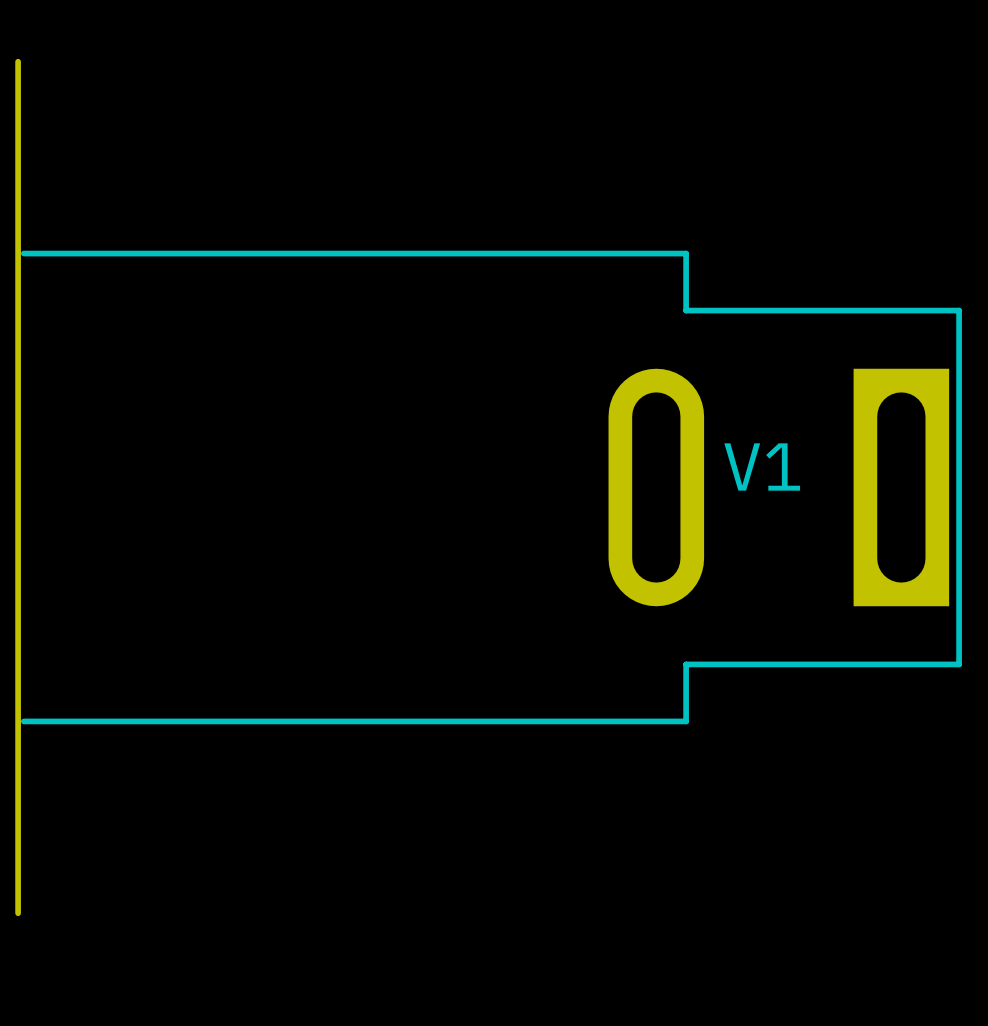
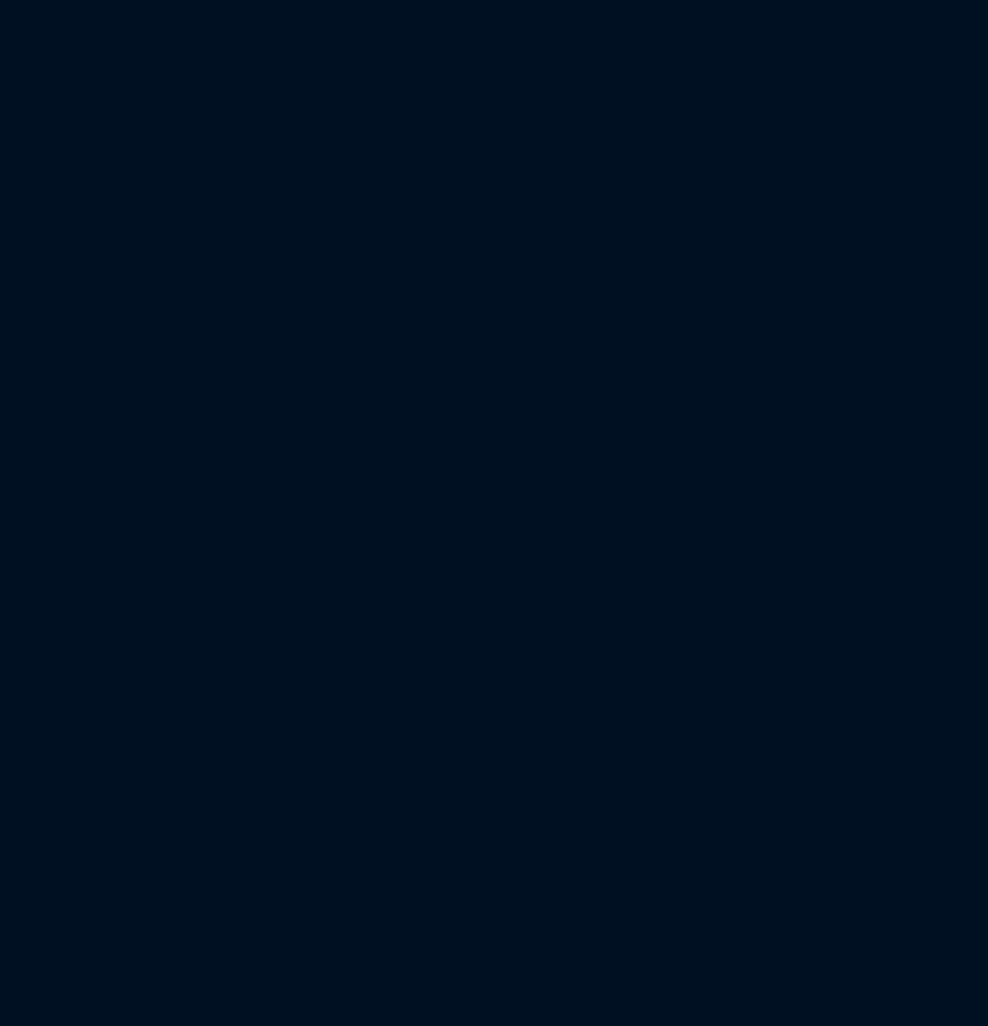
V1: (488, 487) -> none

